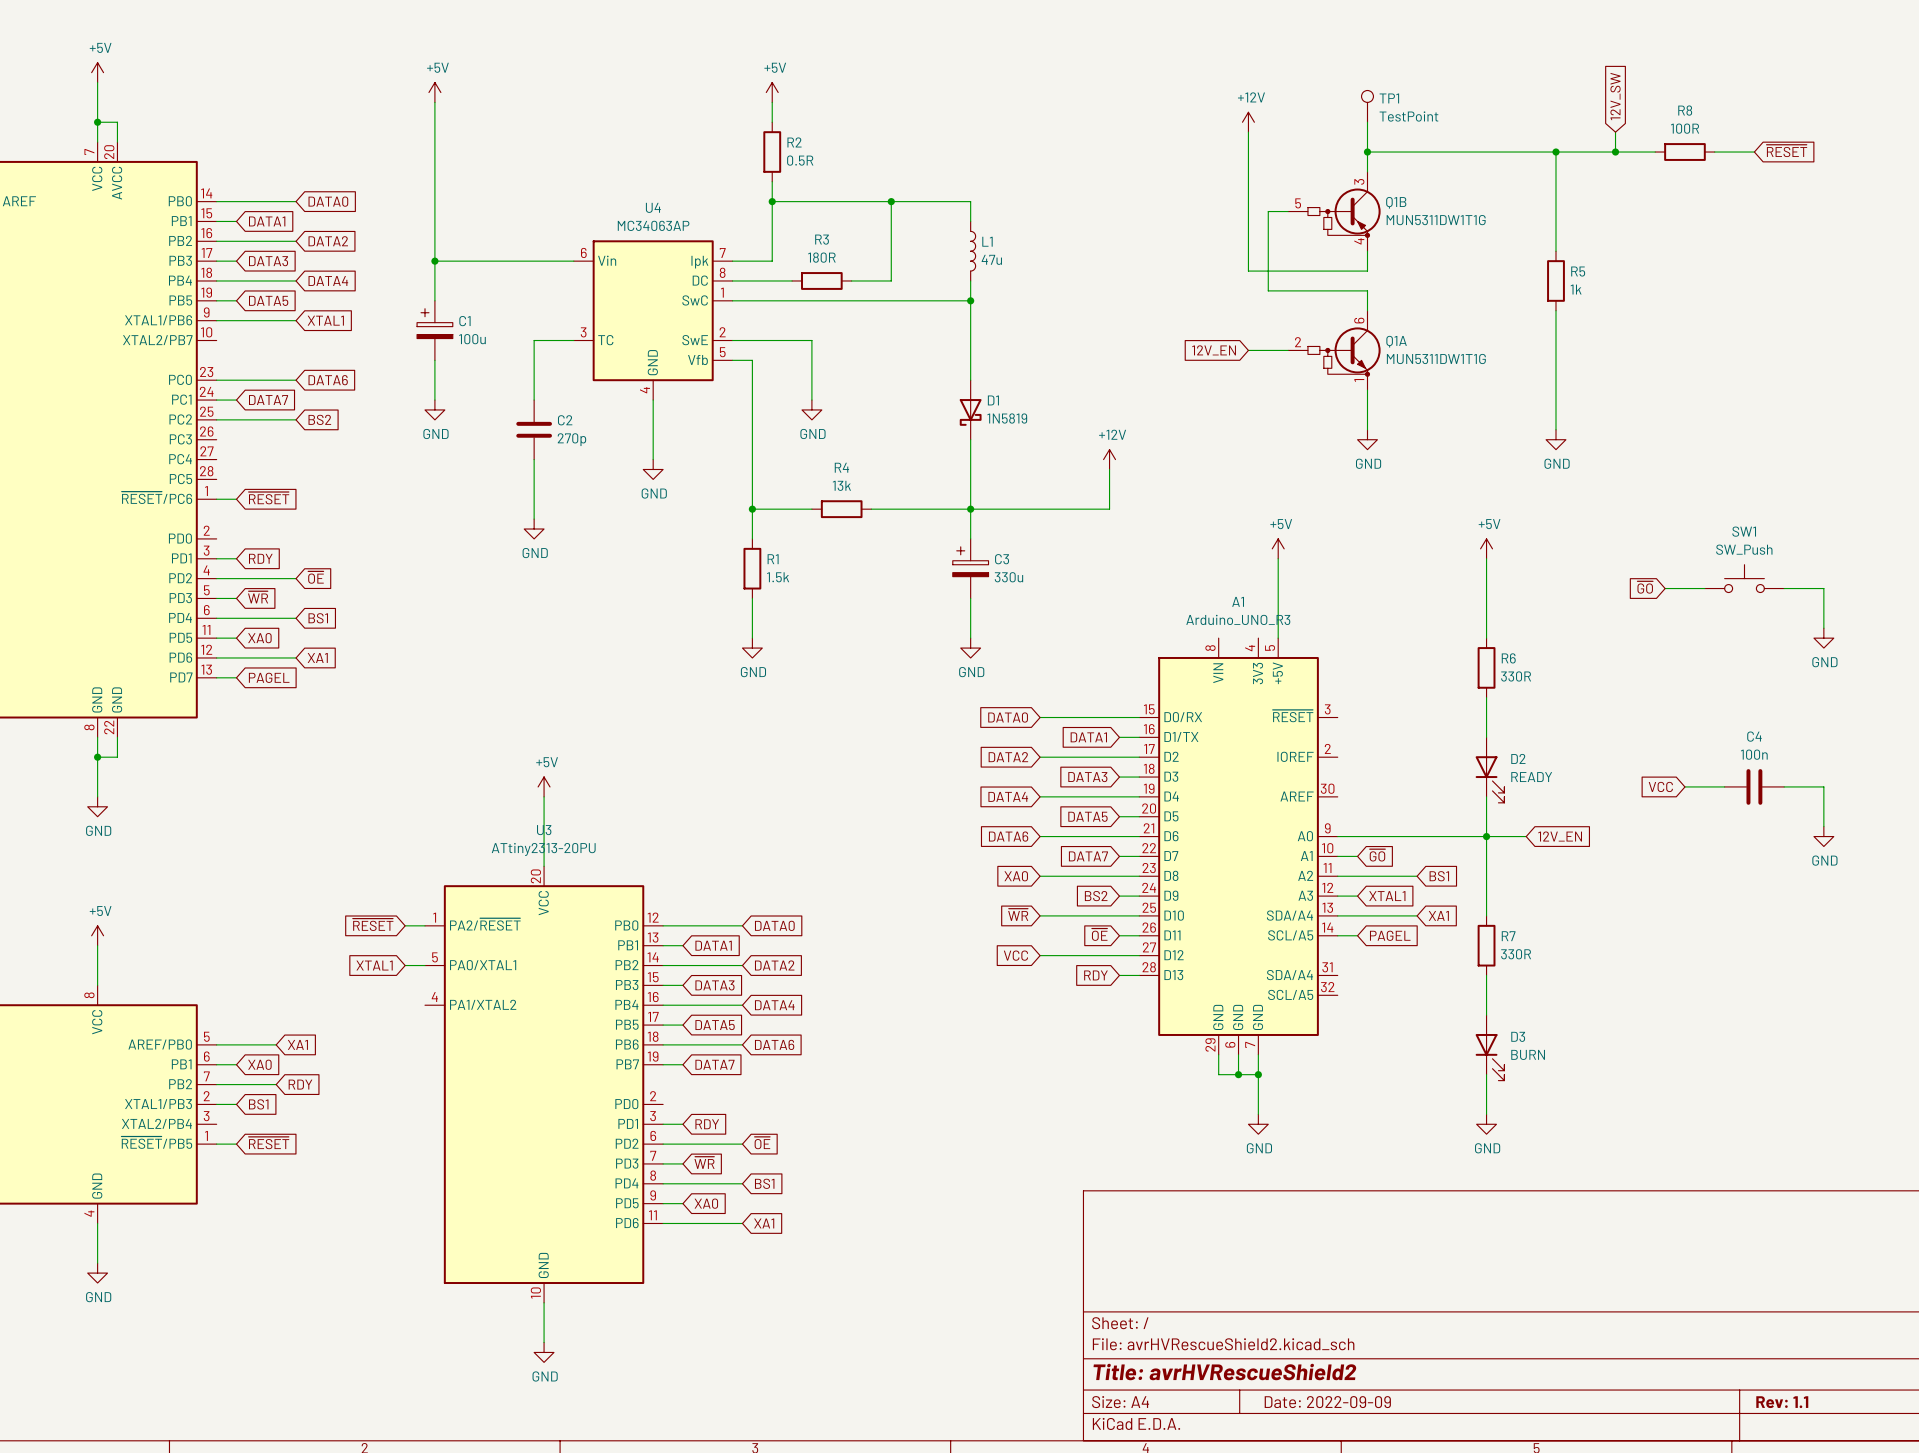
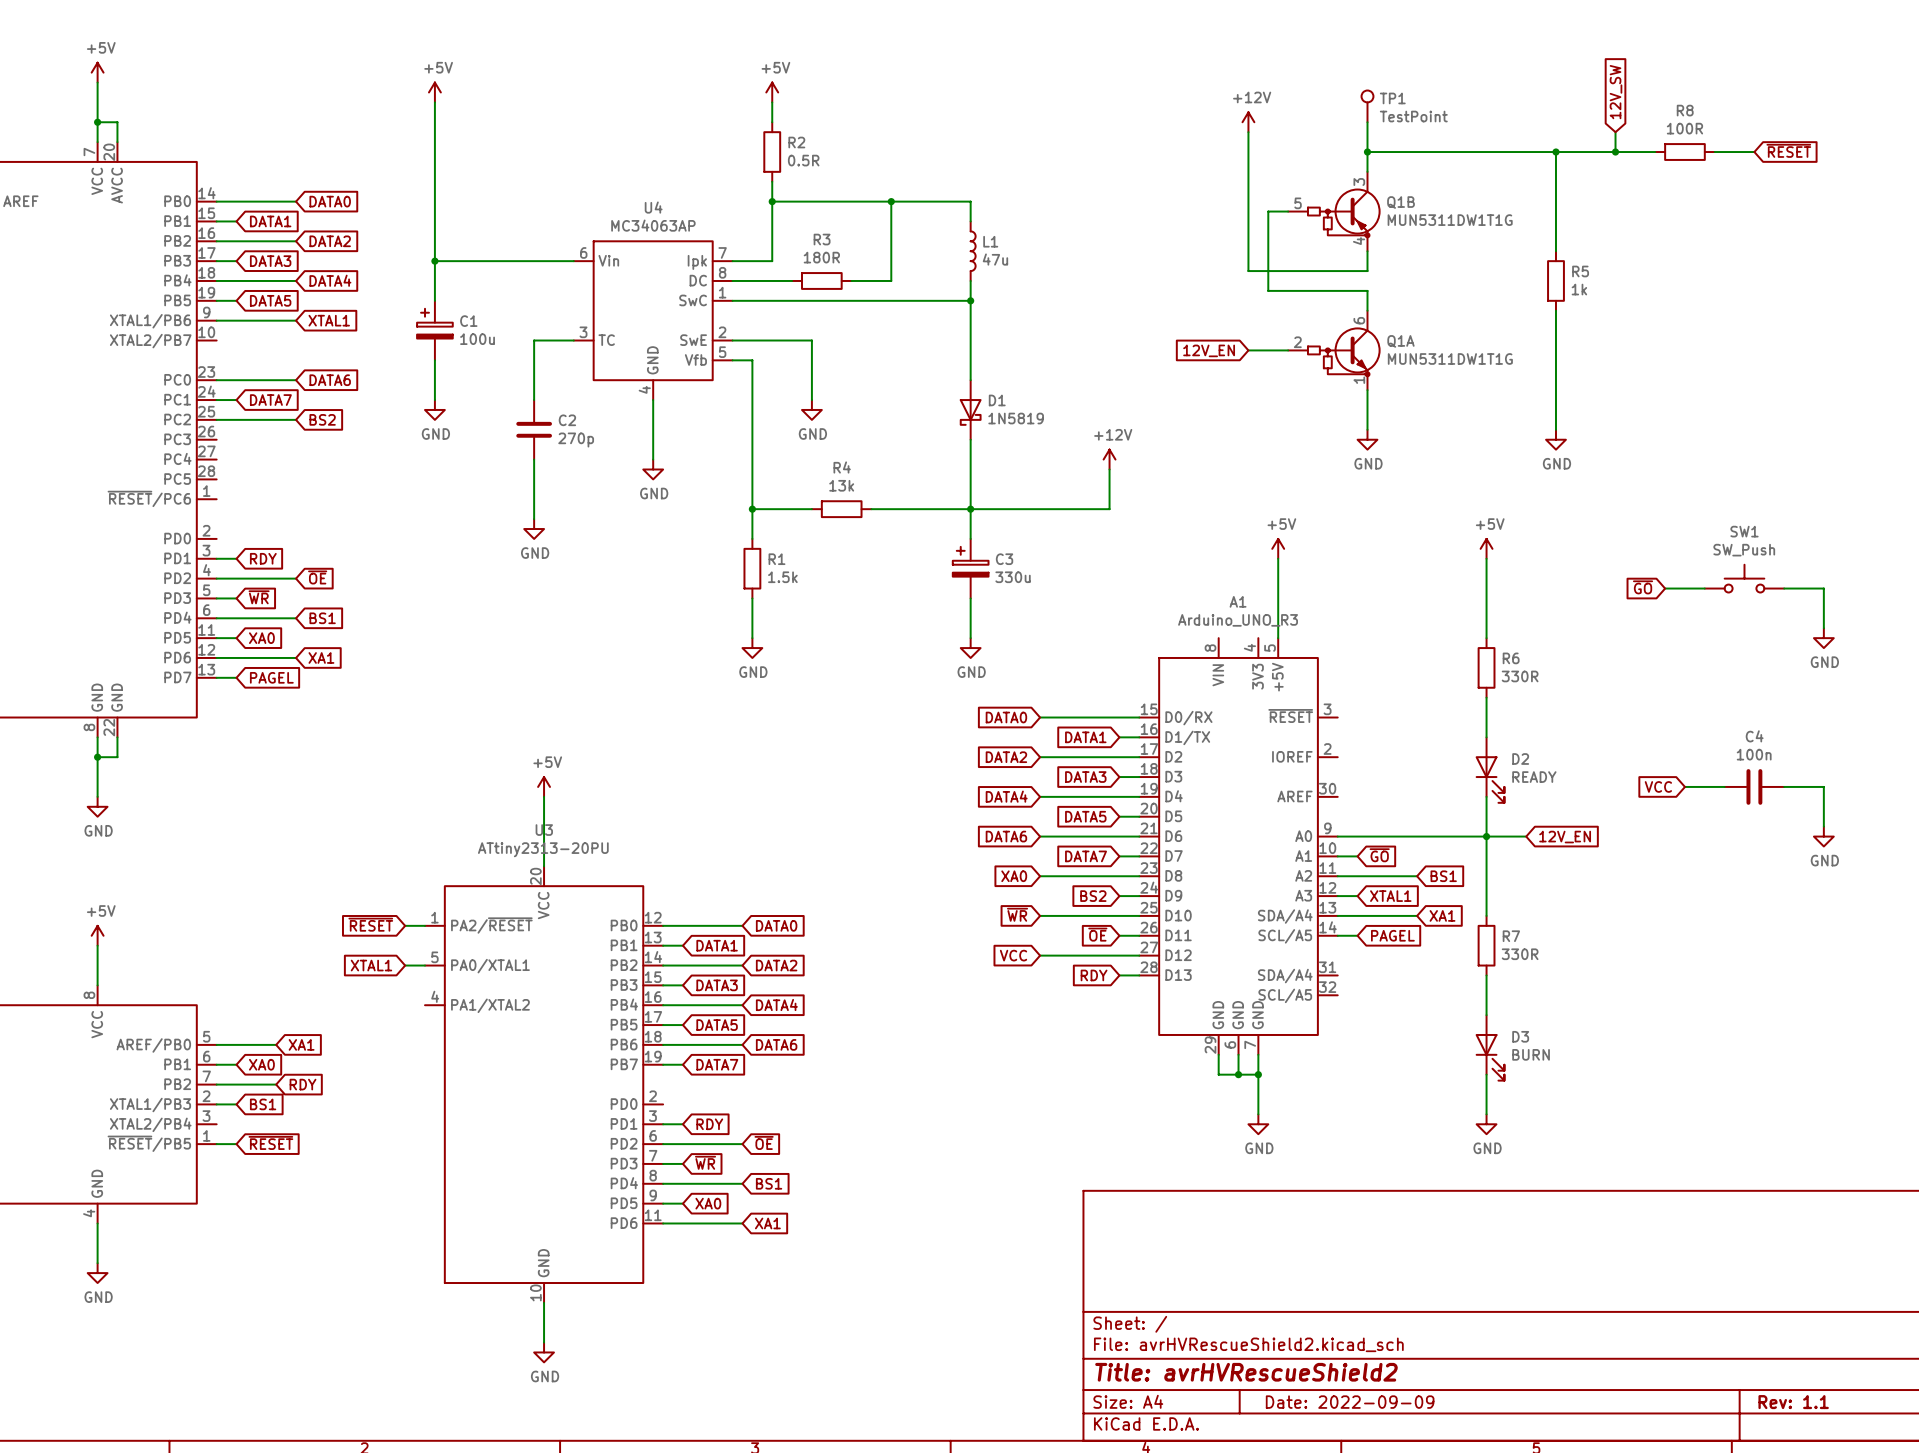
global label: ~{RESET} (268, 498) -> none
wire: (216, 499) (236, 499) -> none

